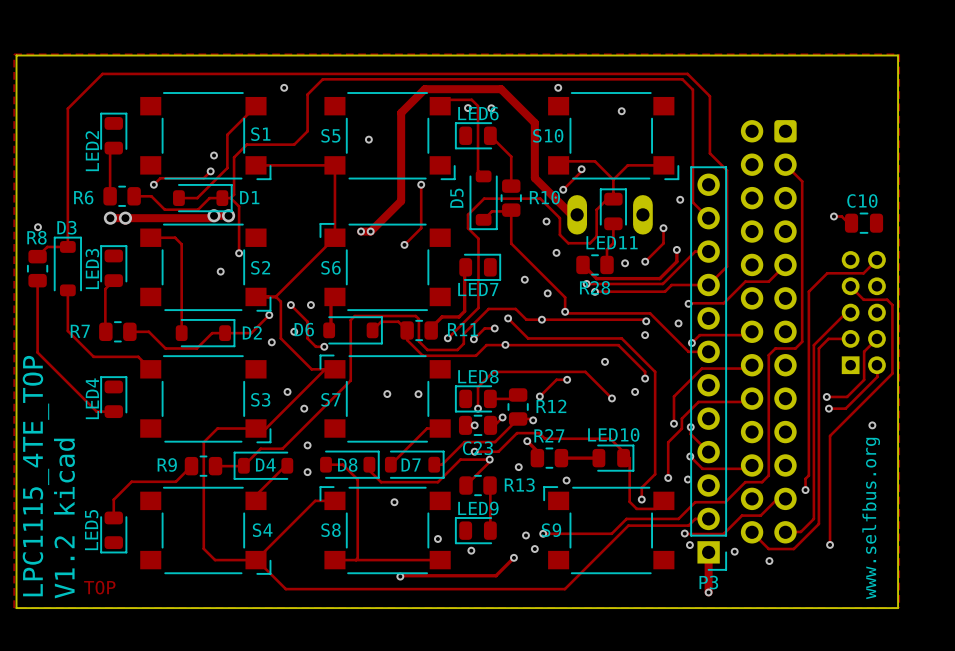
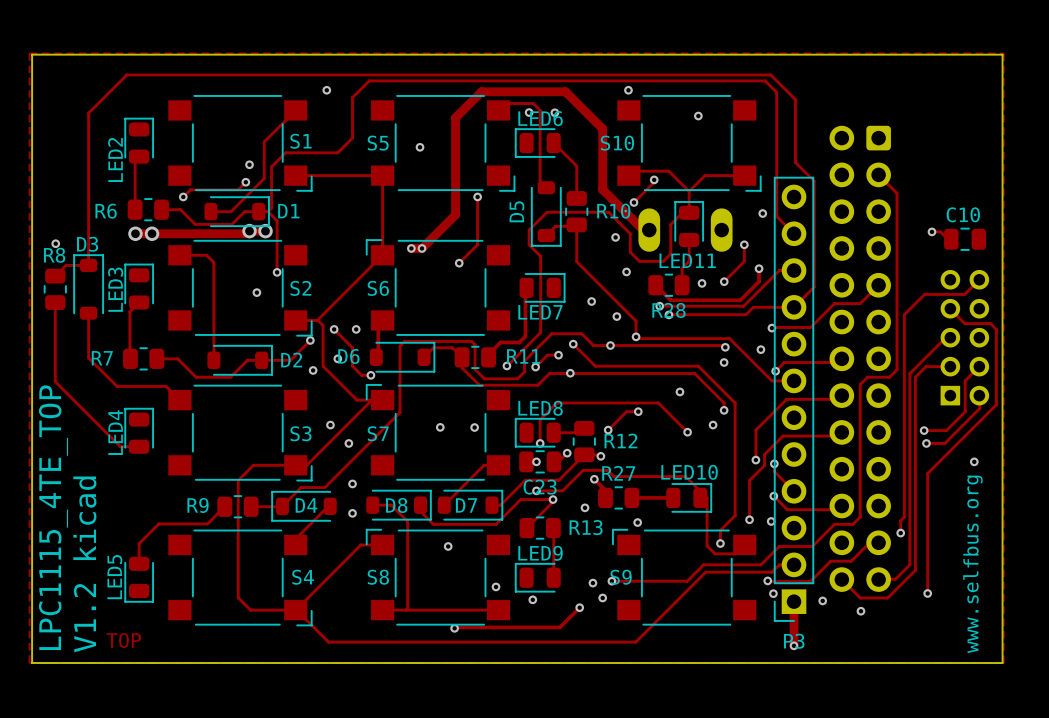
P3 footprint: [690, 166, 727, 571] -> [773, 176, 815, 622]

